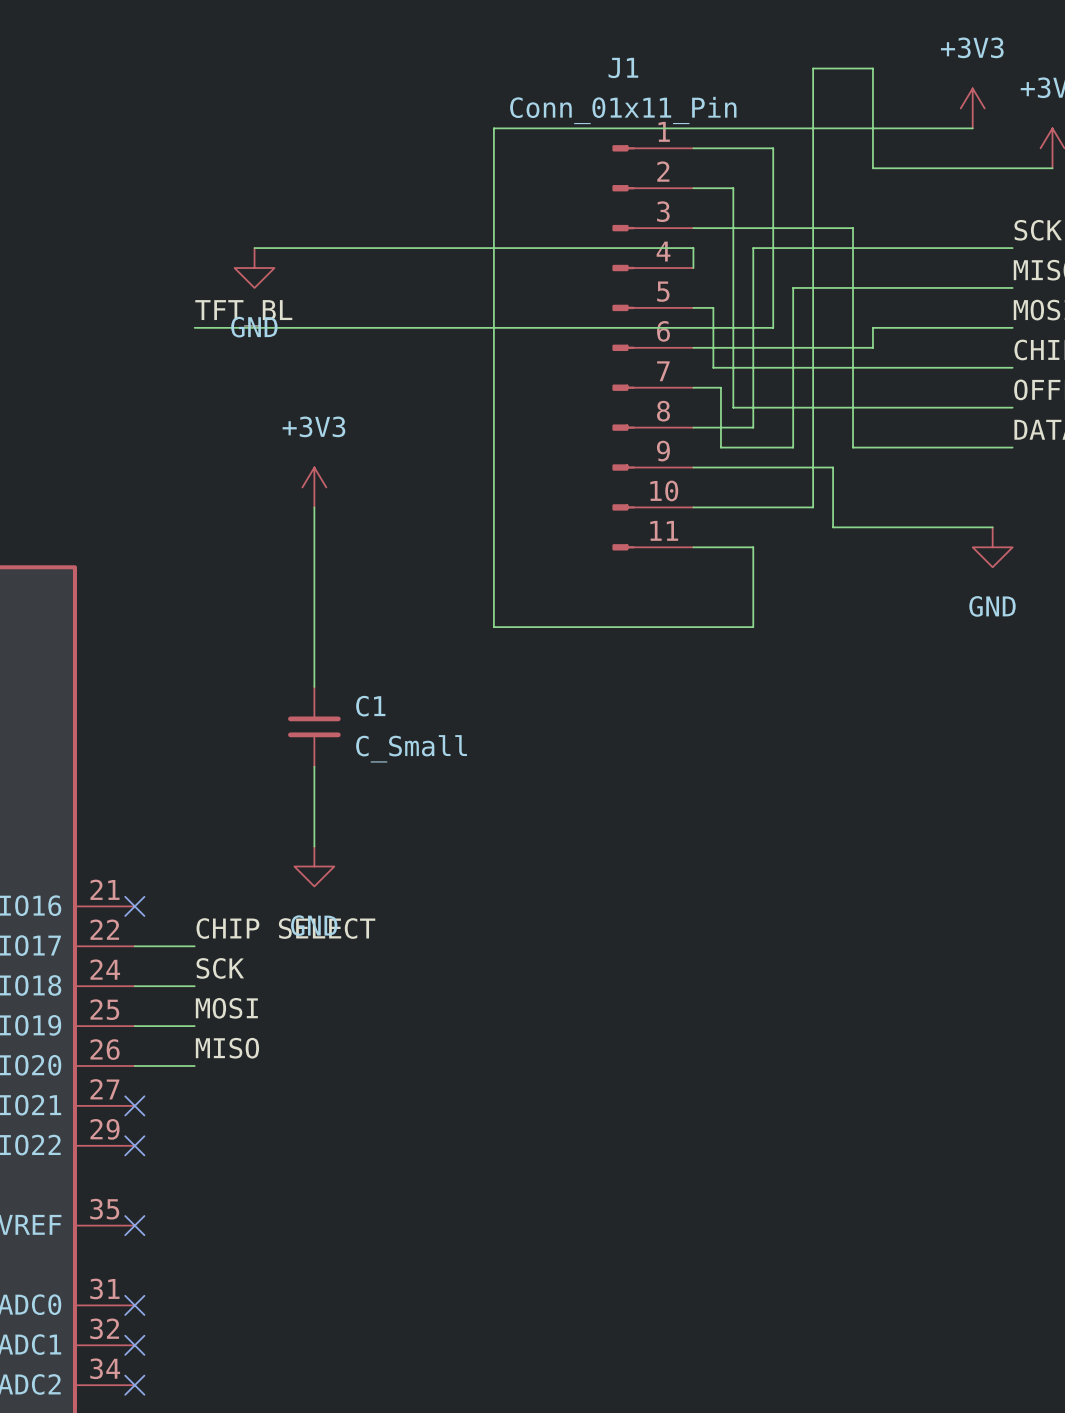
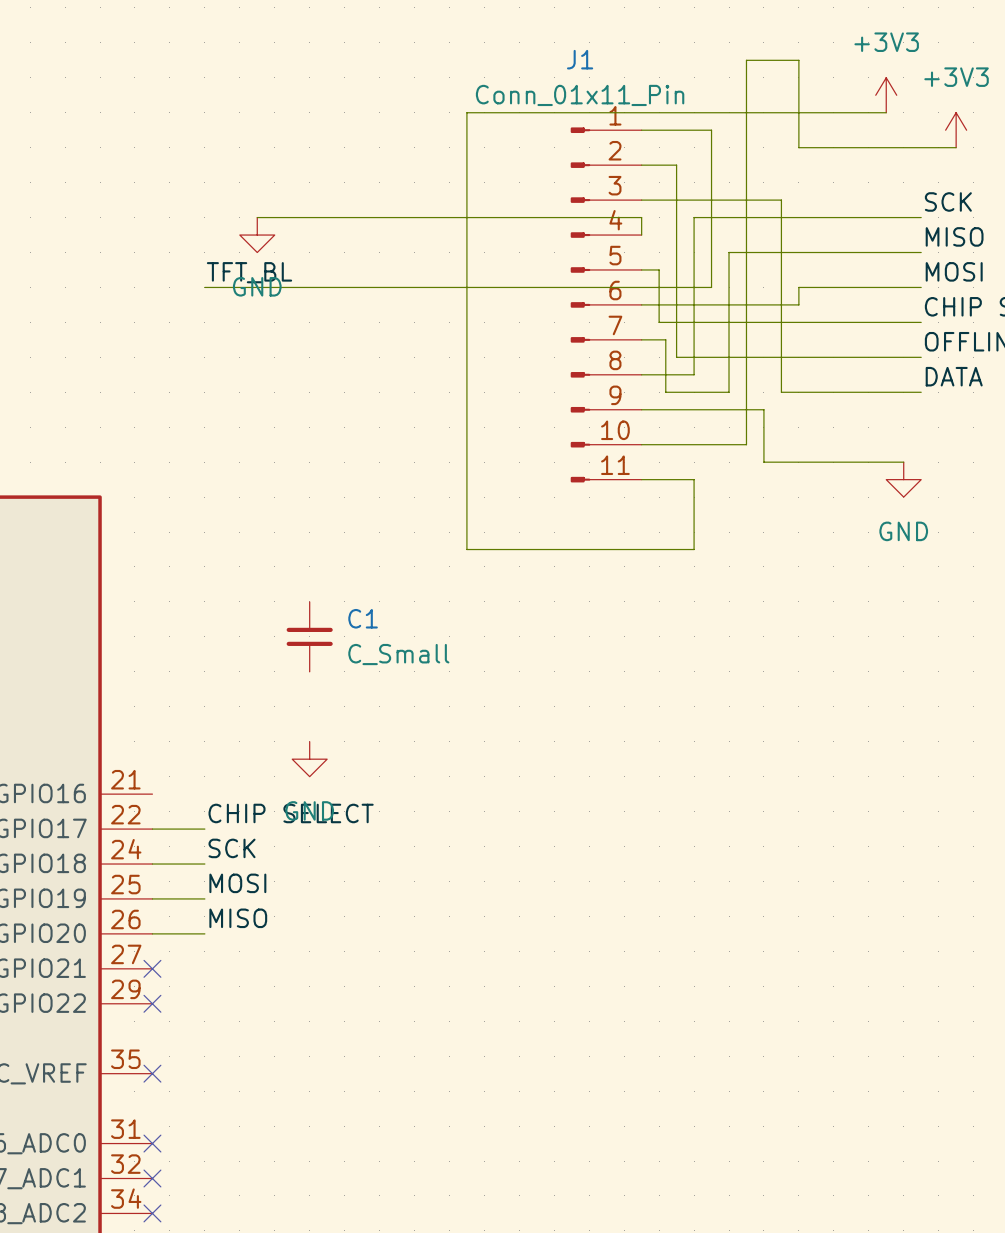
power symbol: +3V3 (314, 487) -> none
wire: (314, 507) (314, 686) -> none
wire: (314, 766) (314, 846) -> none
no-connect mark: (134, 906) -> none

